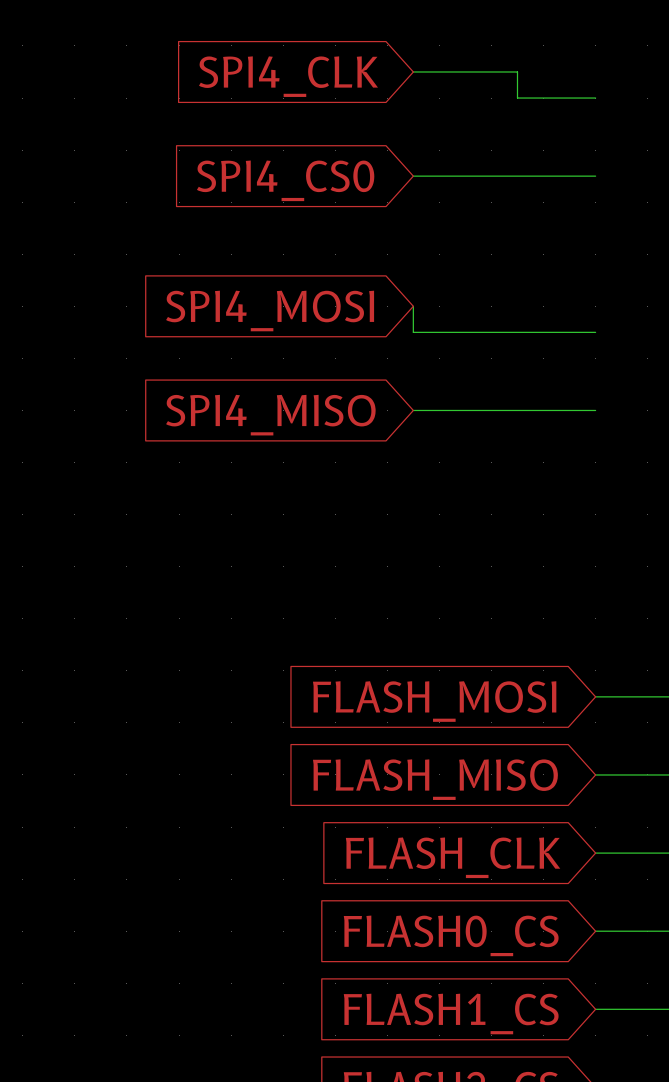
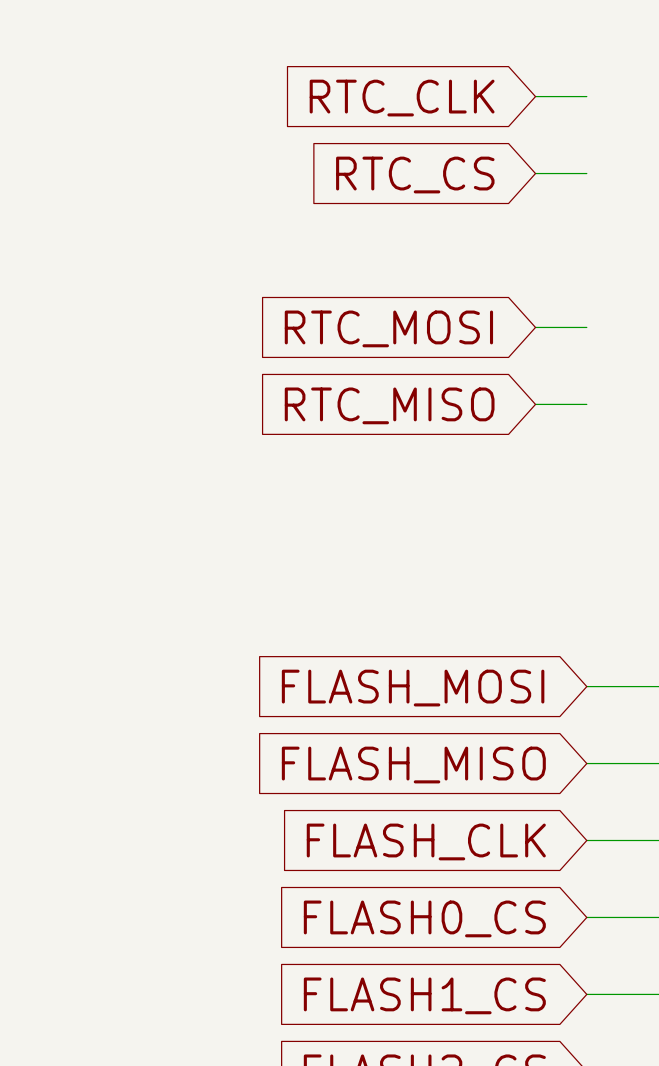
wire: (413, 71) (517, 71) (517, 98) (543, 98) -> none
global label: SPI4_CLK (288, 76) -> none
global label: none -> RTC_CLK (402, 98)
wire: (413, 176) (543, 176) -> none
global label: SPI4_CS0 (285, 180) -> none
global label: none -> RTC_CS (415, 175)
wire: (413, 306) (413, 332) (543, 332) -> none
global label: SPI4_MOSI (270, 311) -> none
global label: none -> RTC_MOSI (388, 328)
wire: (413, 410) (543, 410) -> none
global label: SPI4_MISO (270, 415) -> none
global label: none -> RTC_MISO (389, 405)

